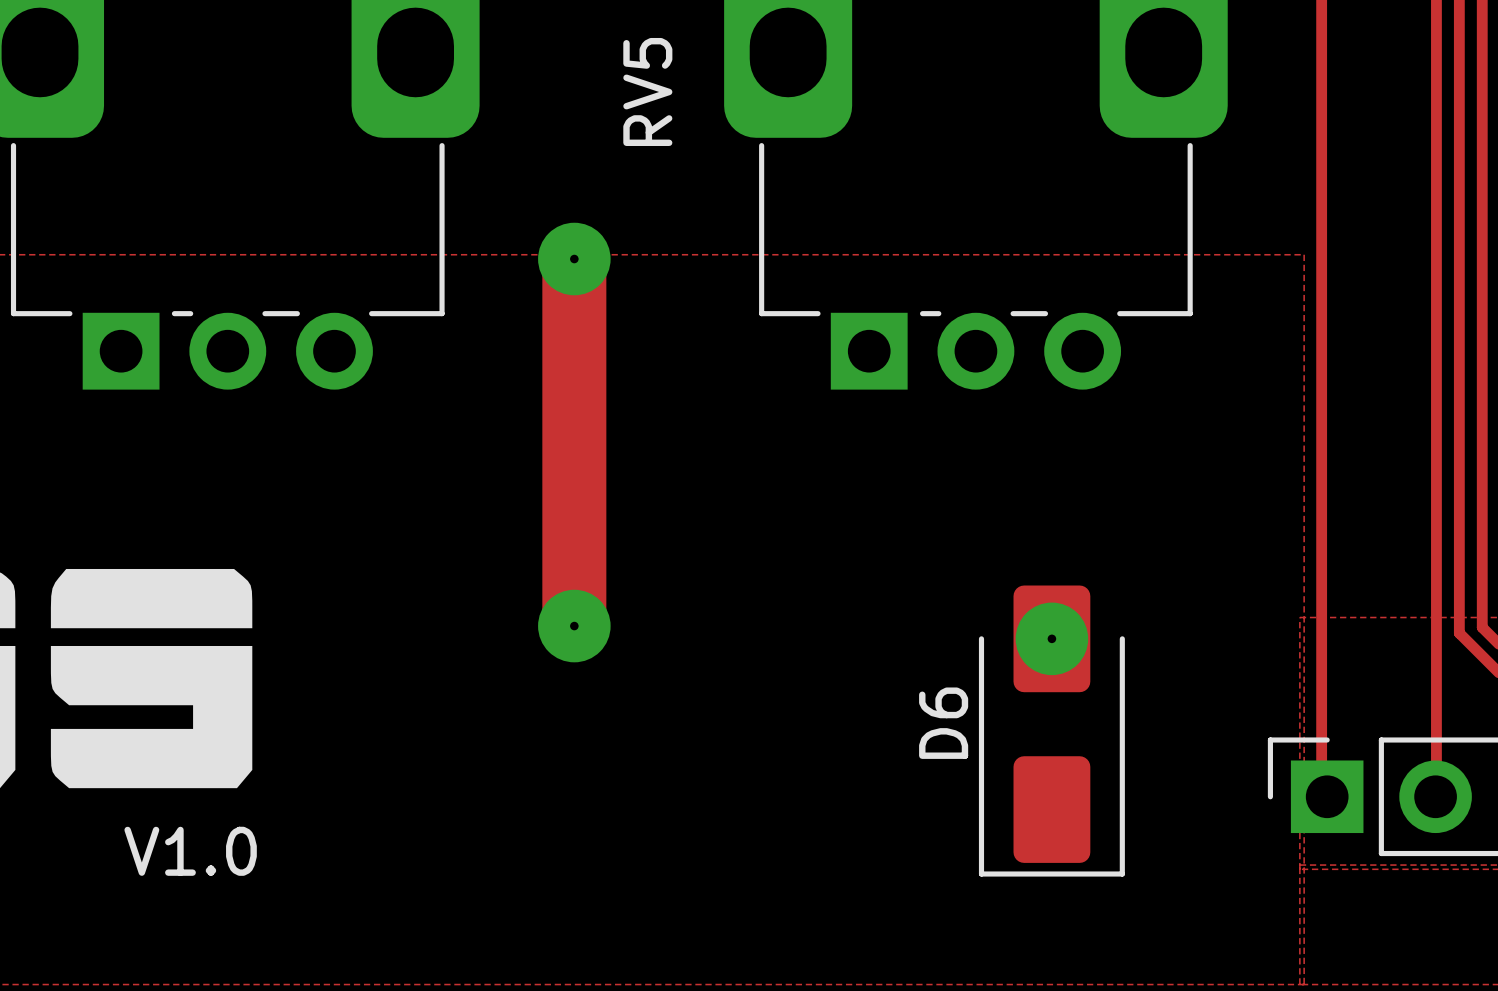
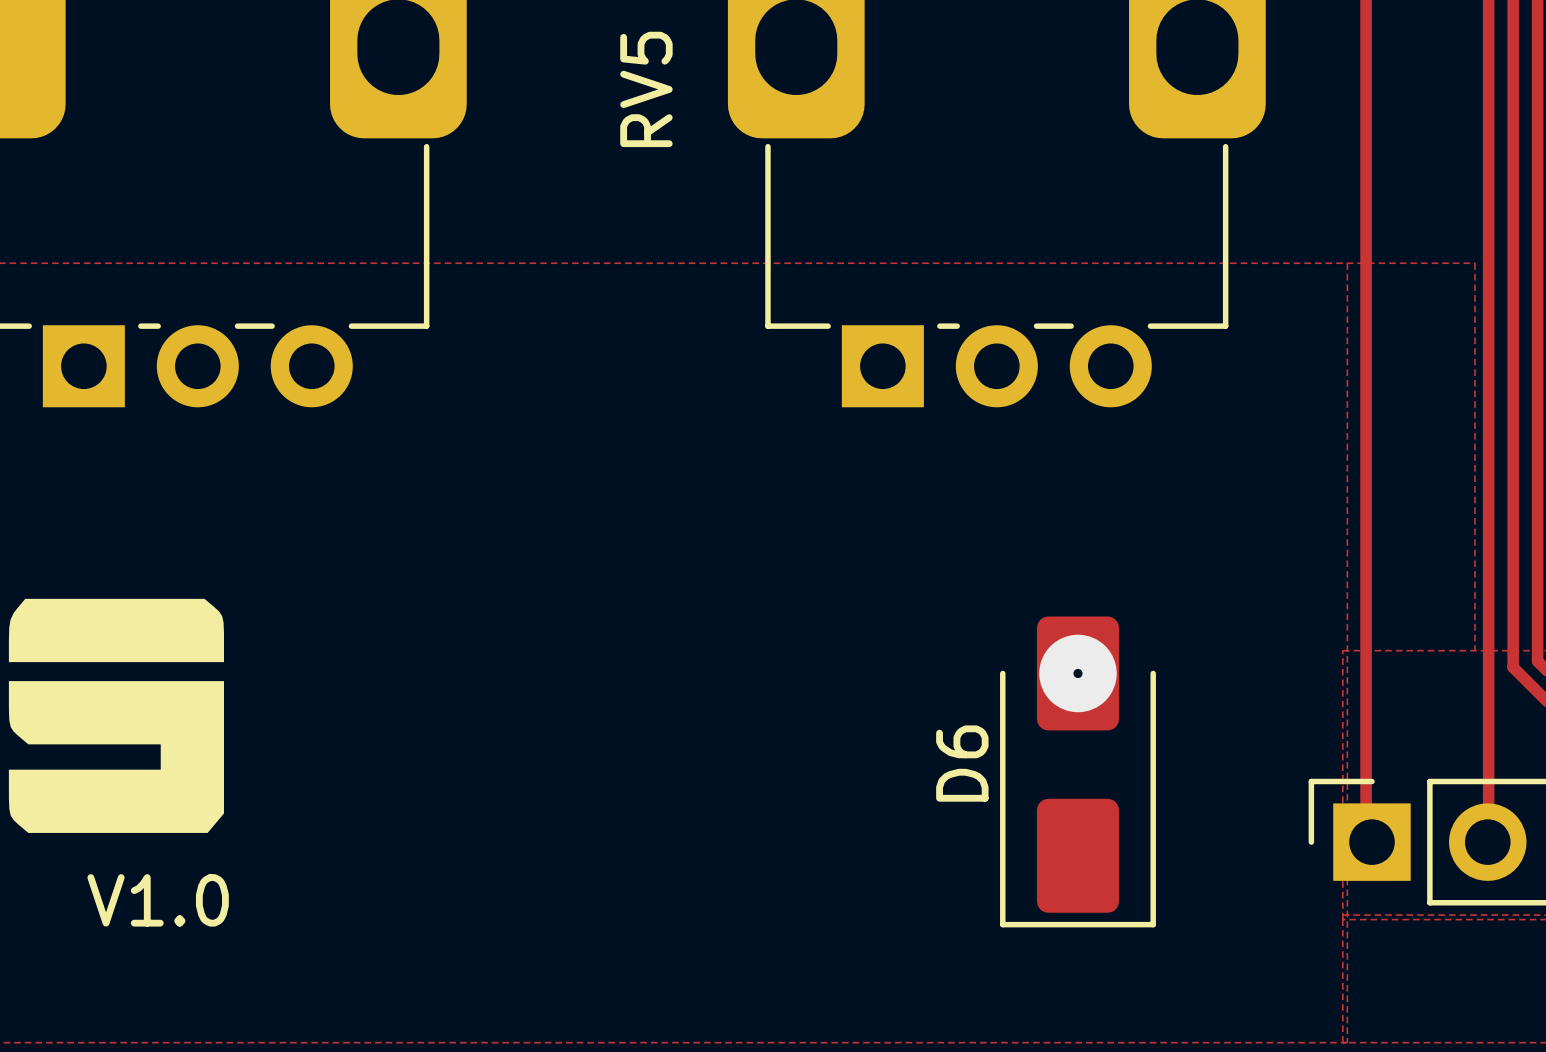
zone outline: none -> (1347, 263) (1475, 263) (1475, 650)
track: (574, 259) (574, 626) -> none
via: (574, 259) -> none
via: (574, 626) -> none

